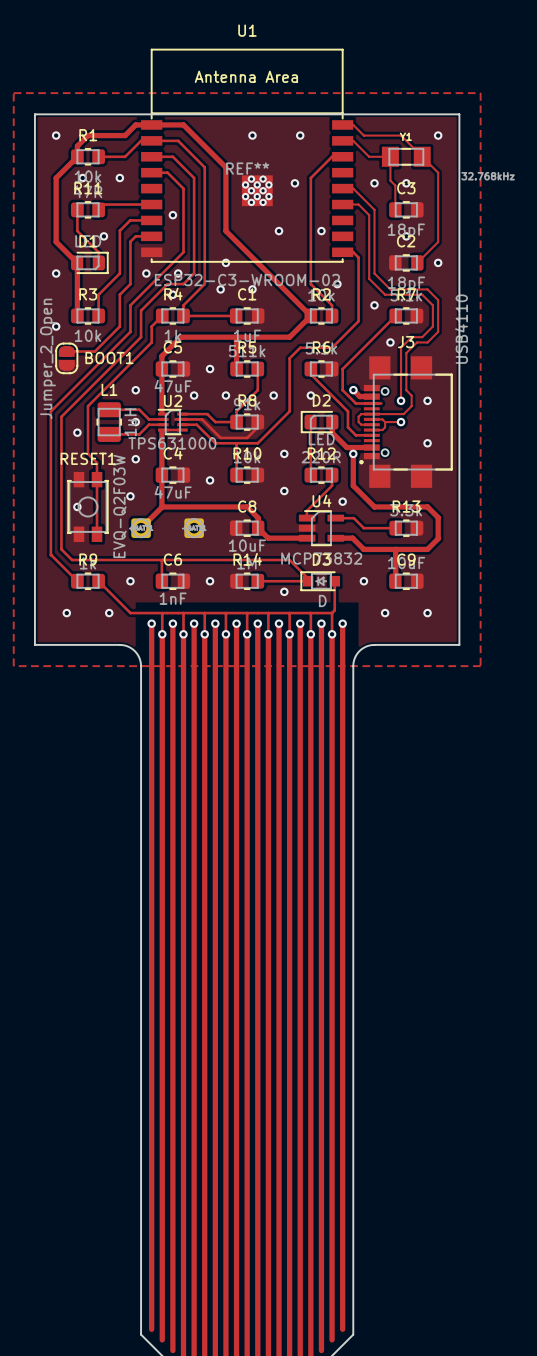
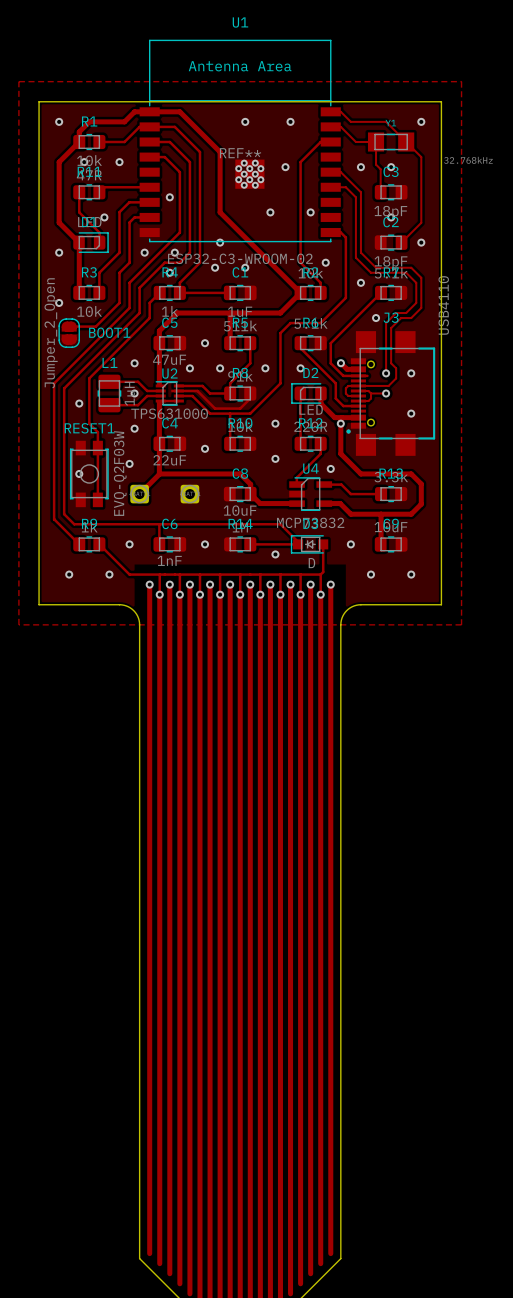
C4 value: 47uF (173, 492) -> 22uF (169, 460)

